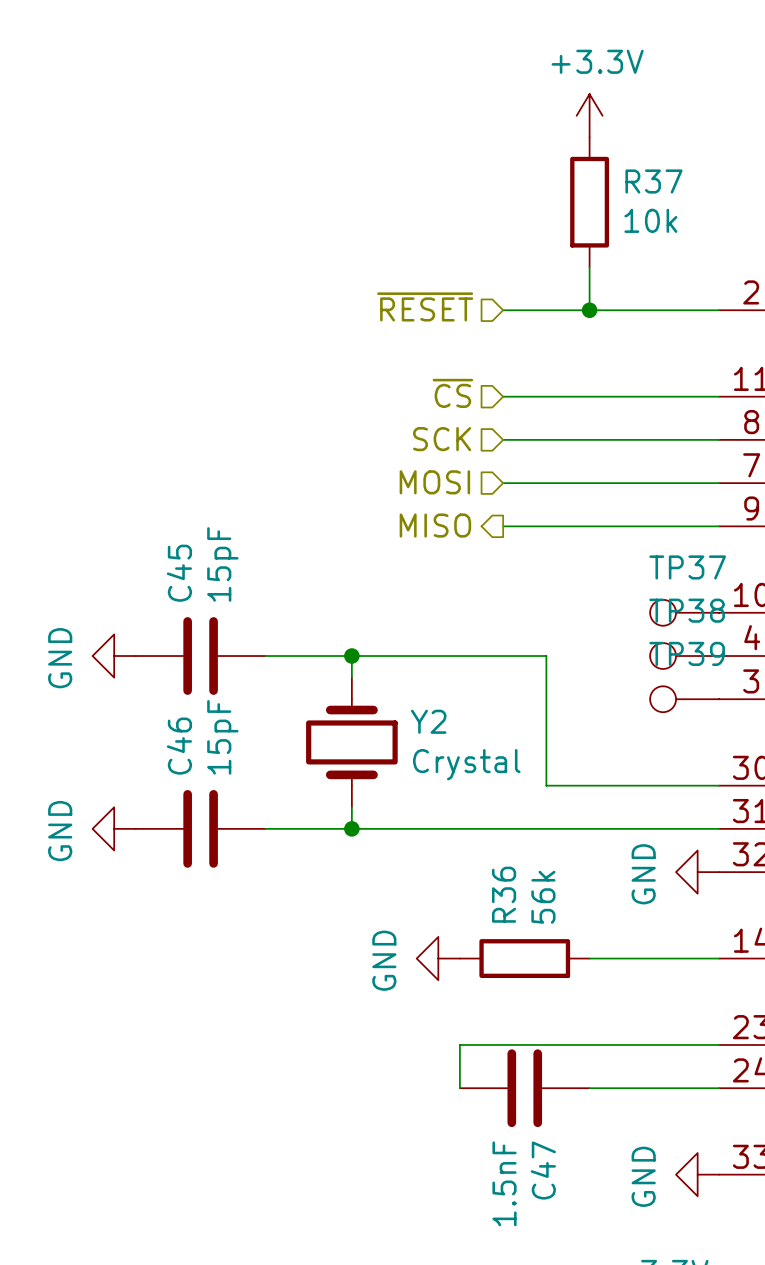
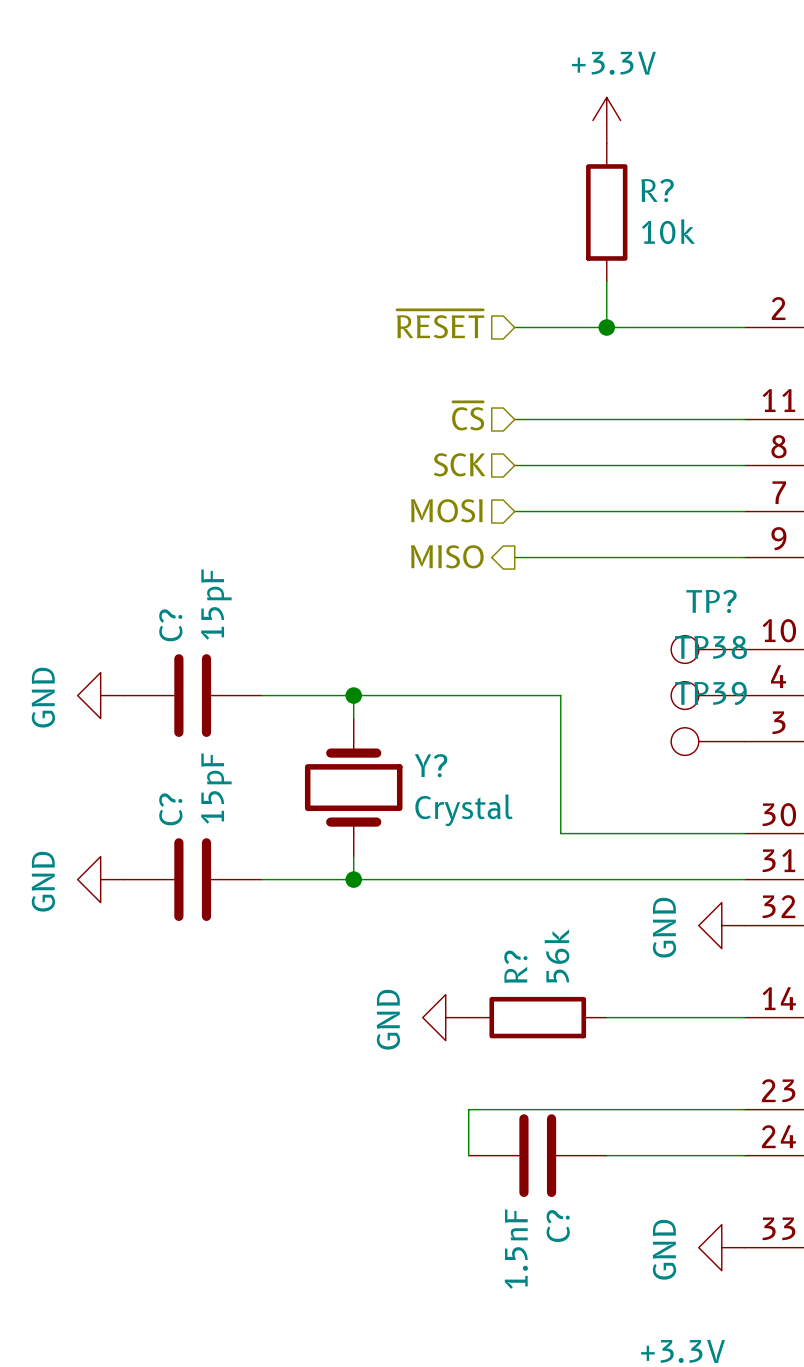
R37 name: R37 (653, 181) -> R? (657, 190)
TP37 name: TP37 (687, 567) -> TP? (711, 601)
C45 name: C45 (179, 573) -> C? (170, 625)
Y2 name: Y2 (428, 721) -> Y? (431, 765)
C46 name: C46 (179, 746) -> C? (170, 809)
R36 name: R36 (504, 894) -> R? (515, 966)
C47 name: C47 (543, 1170) -> C? (558, 1226)

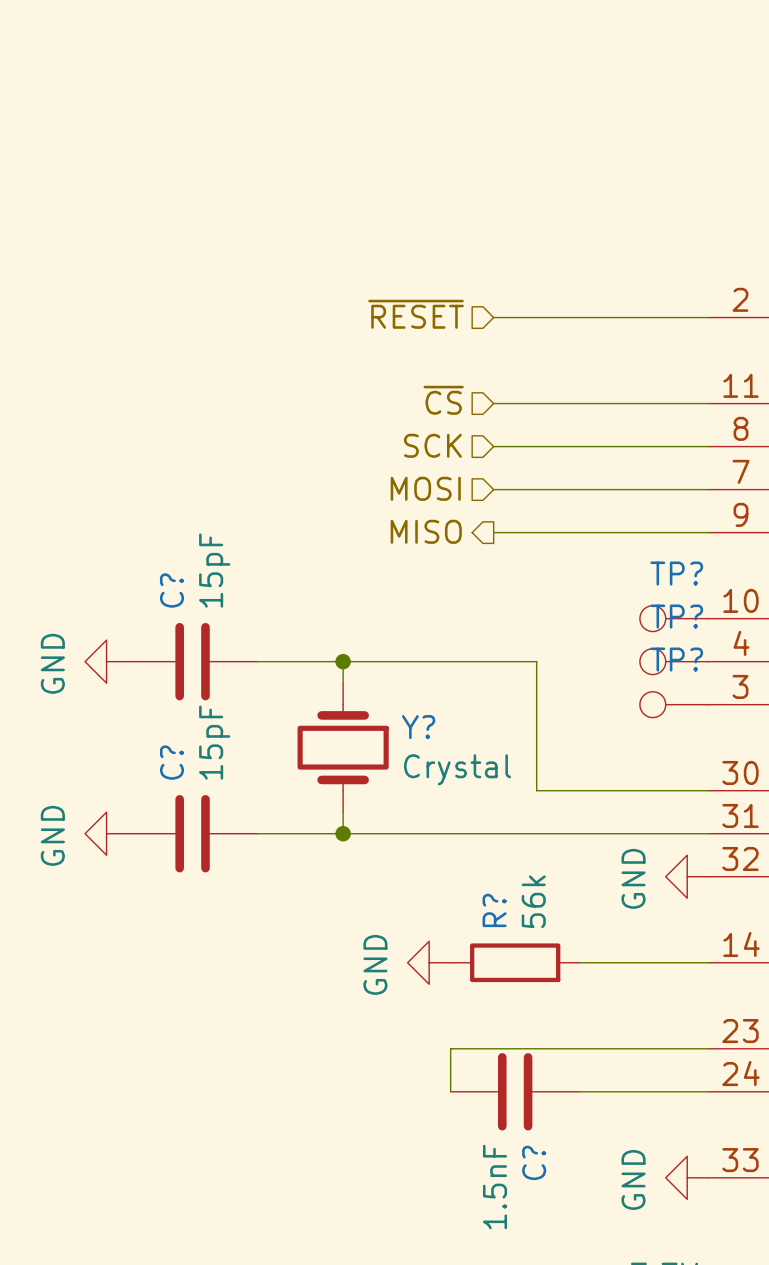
power symbol: +3.3V (606, 120) -> none
R?: 10k (606, 212) -> none
wire: (606, 281) (606, 327) -> none
junction: (606, 327) -> none
TP38 name: TP38 (710, 647) -> TP? (676, 616)
TP39 name: TP39 (710, 693) -> TP? (676, 659)

